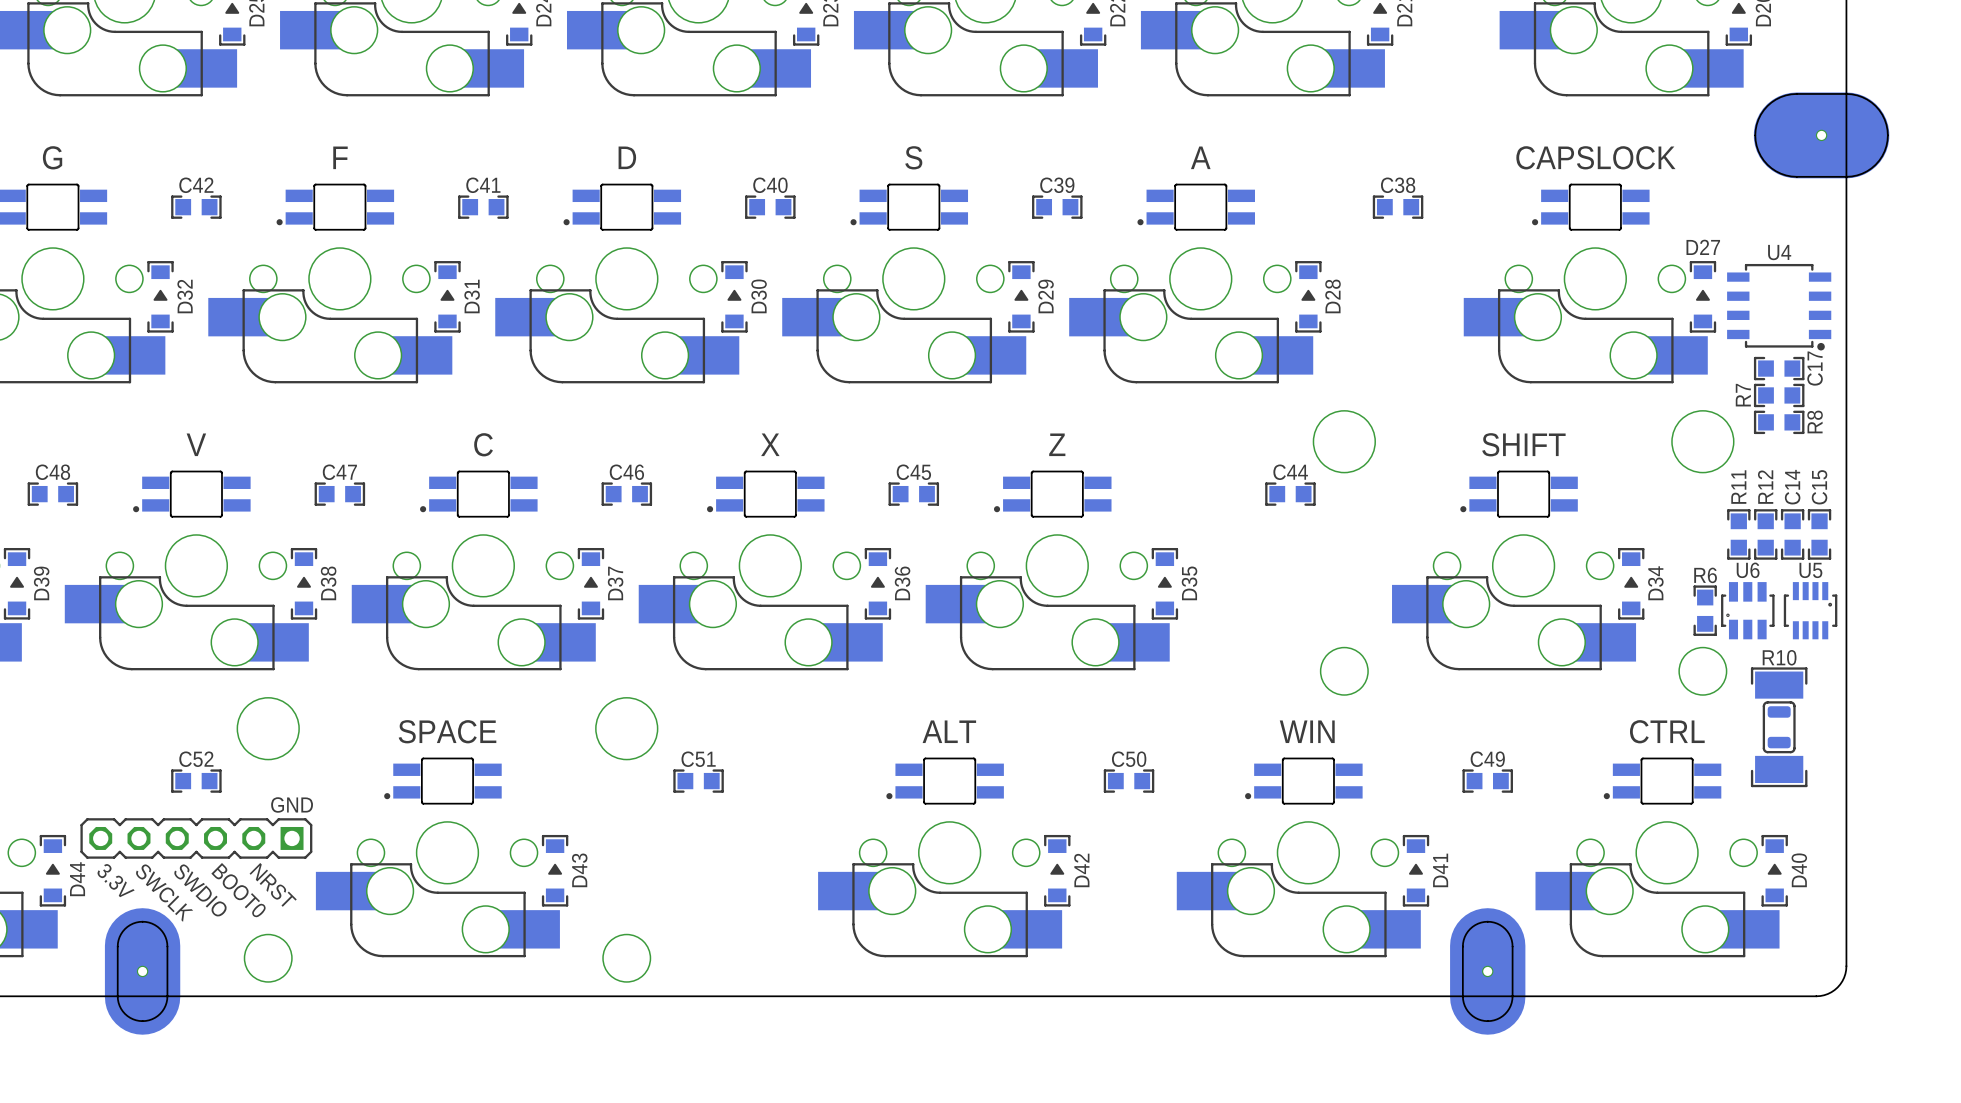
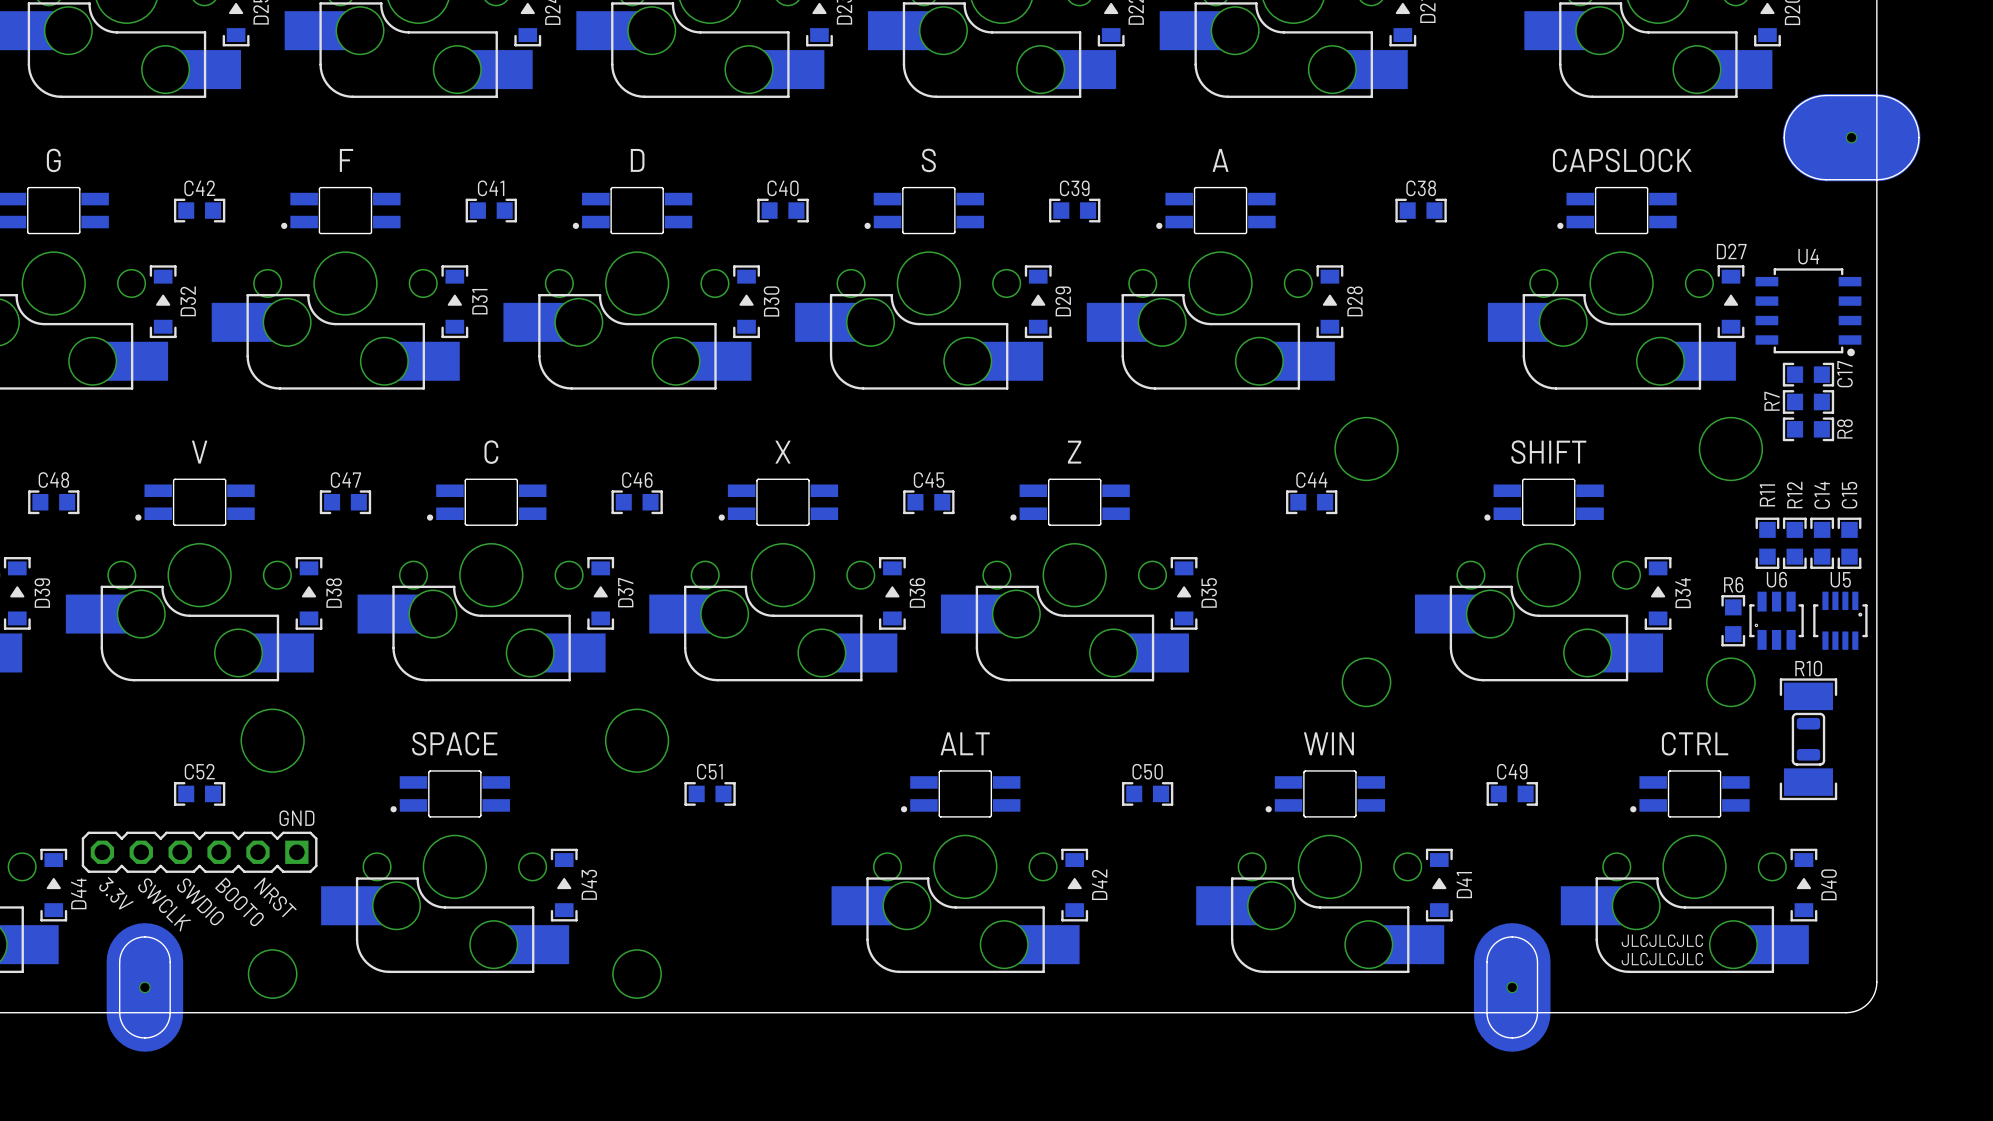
text: none -> JLCJLCJLC (1662, 940)
text: none -> JLCJLCJLC (1662, 959)

